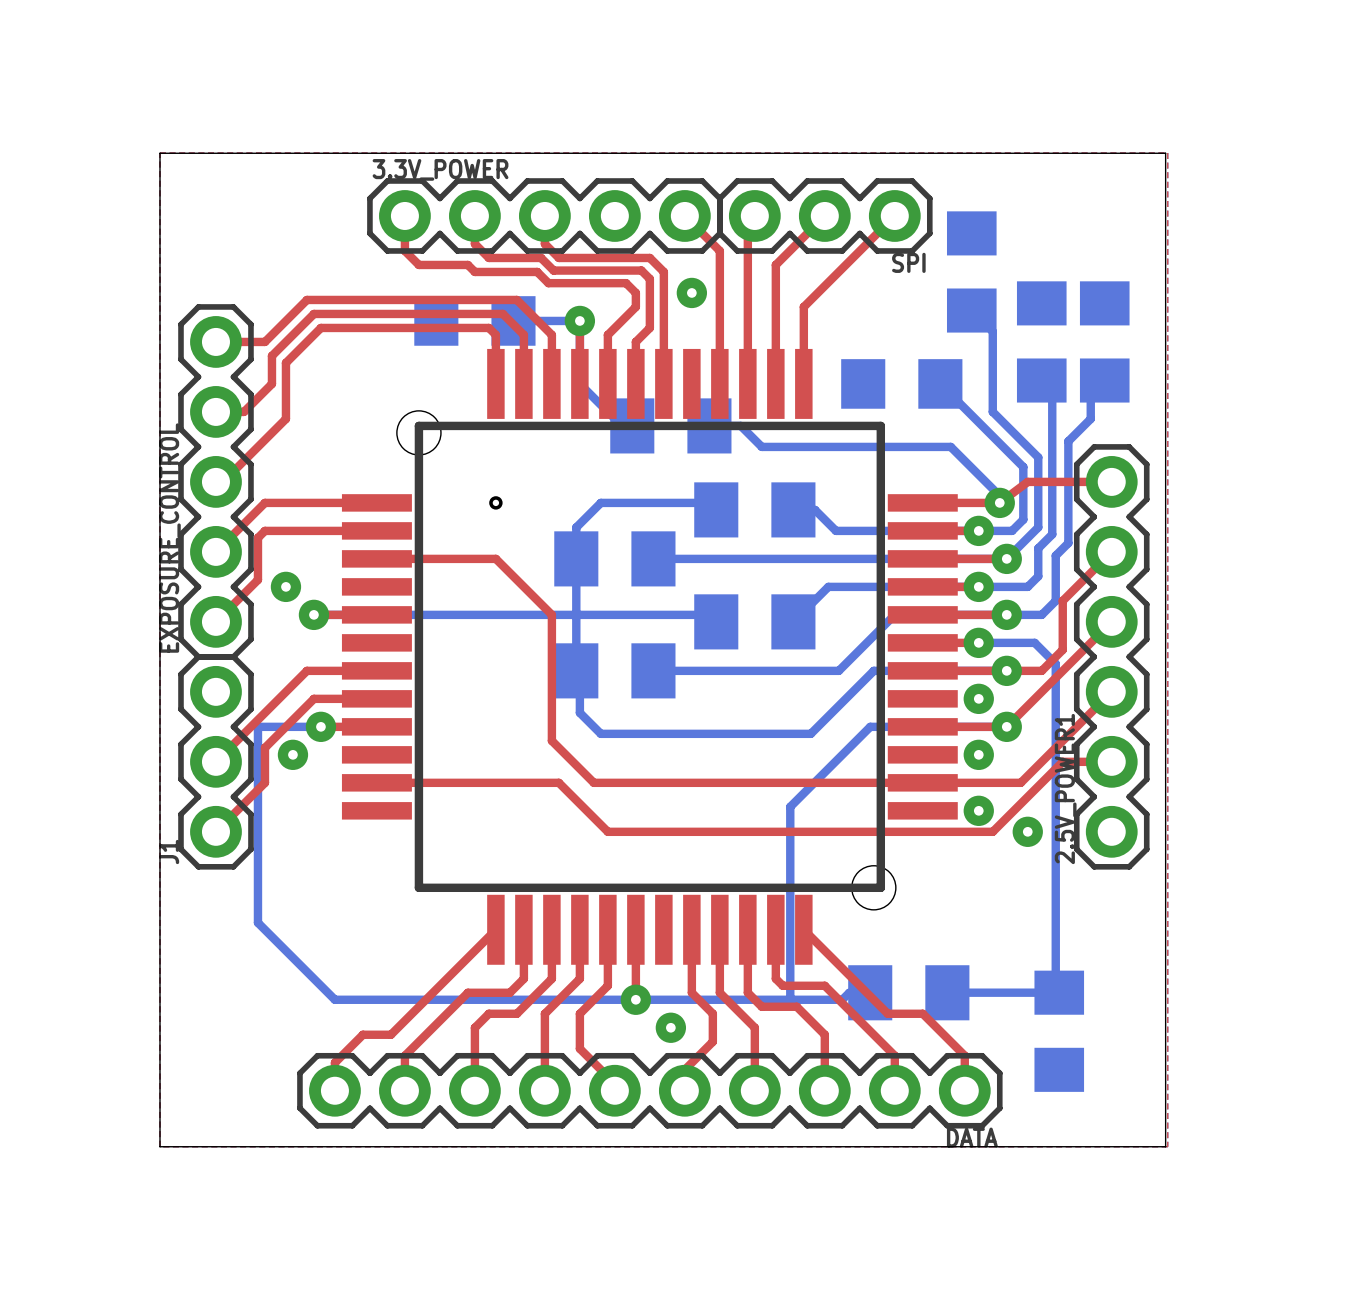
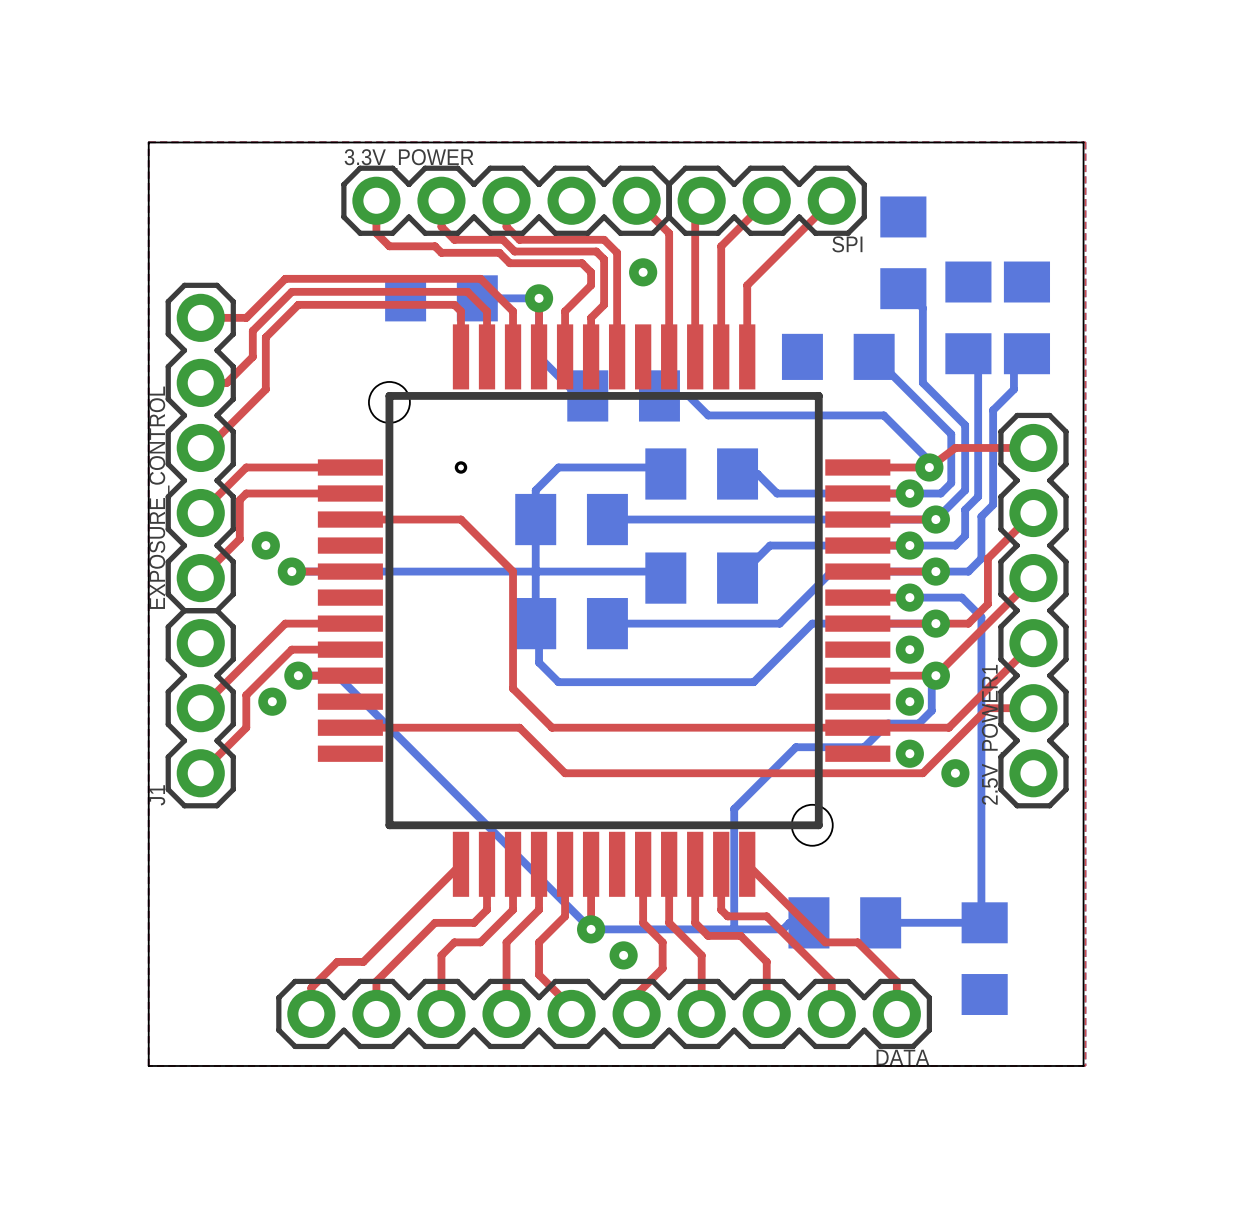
bottom track: (320, 726) (257, 726) (257, 922) (334, 999) (635, 999) -> (298, 675) (337, 675) (591, 929)
bottom track: (1006, 726) (870, 726) (790, 806) (790, 999) -> (935, 675) (931, 679) (931, 710) (918, 723) (887, 723) (864, 747) (796, 747) (734, 809) (734, 929)

